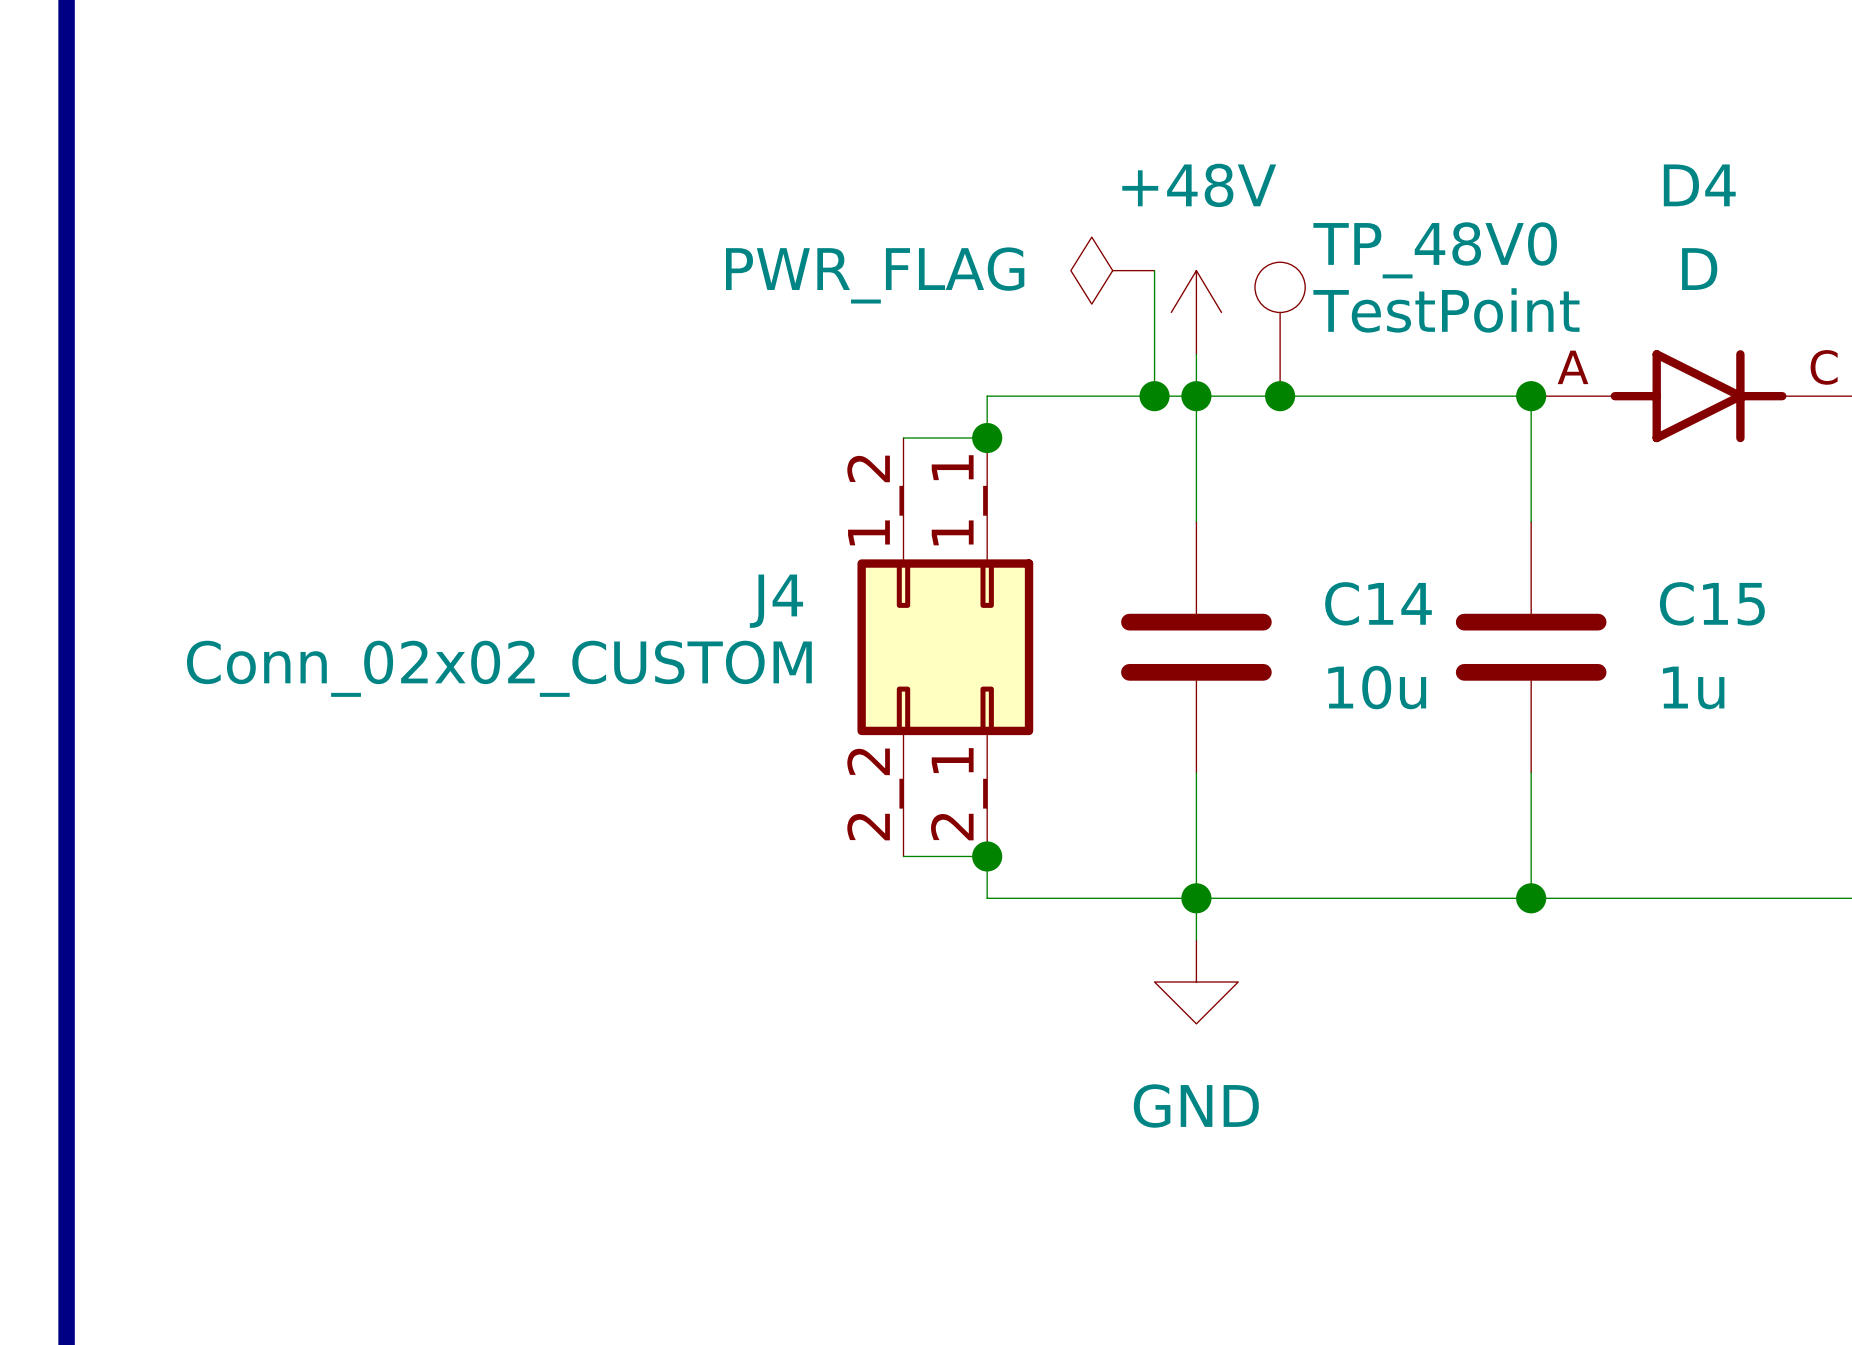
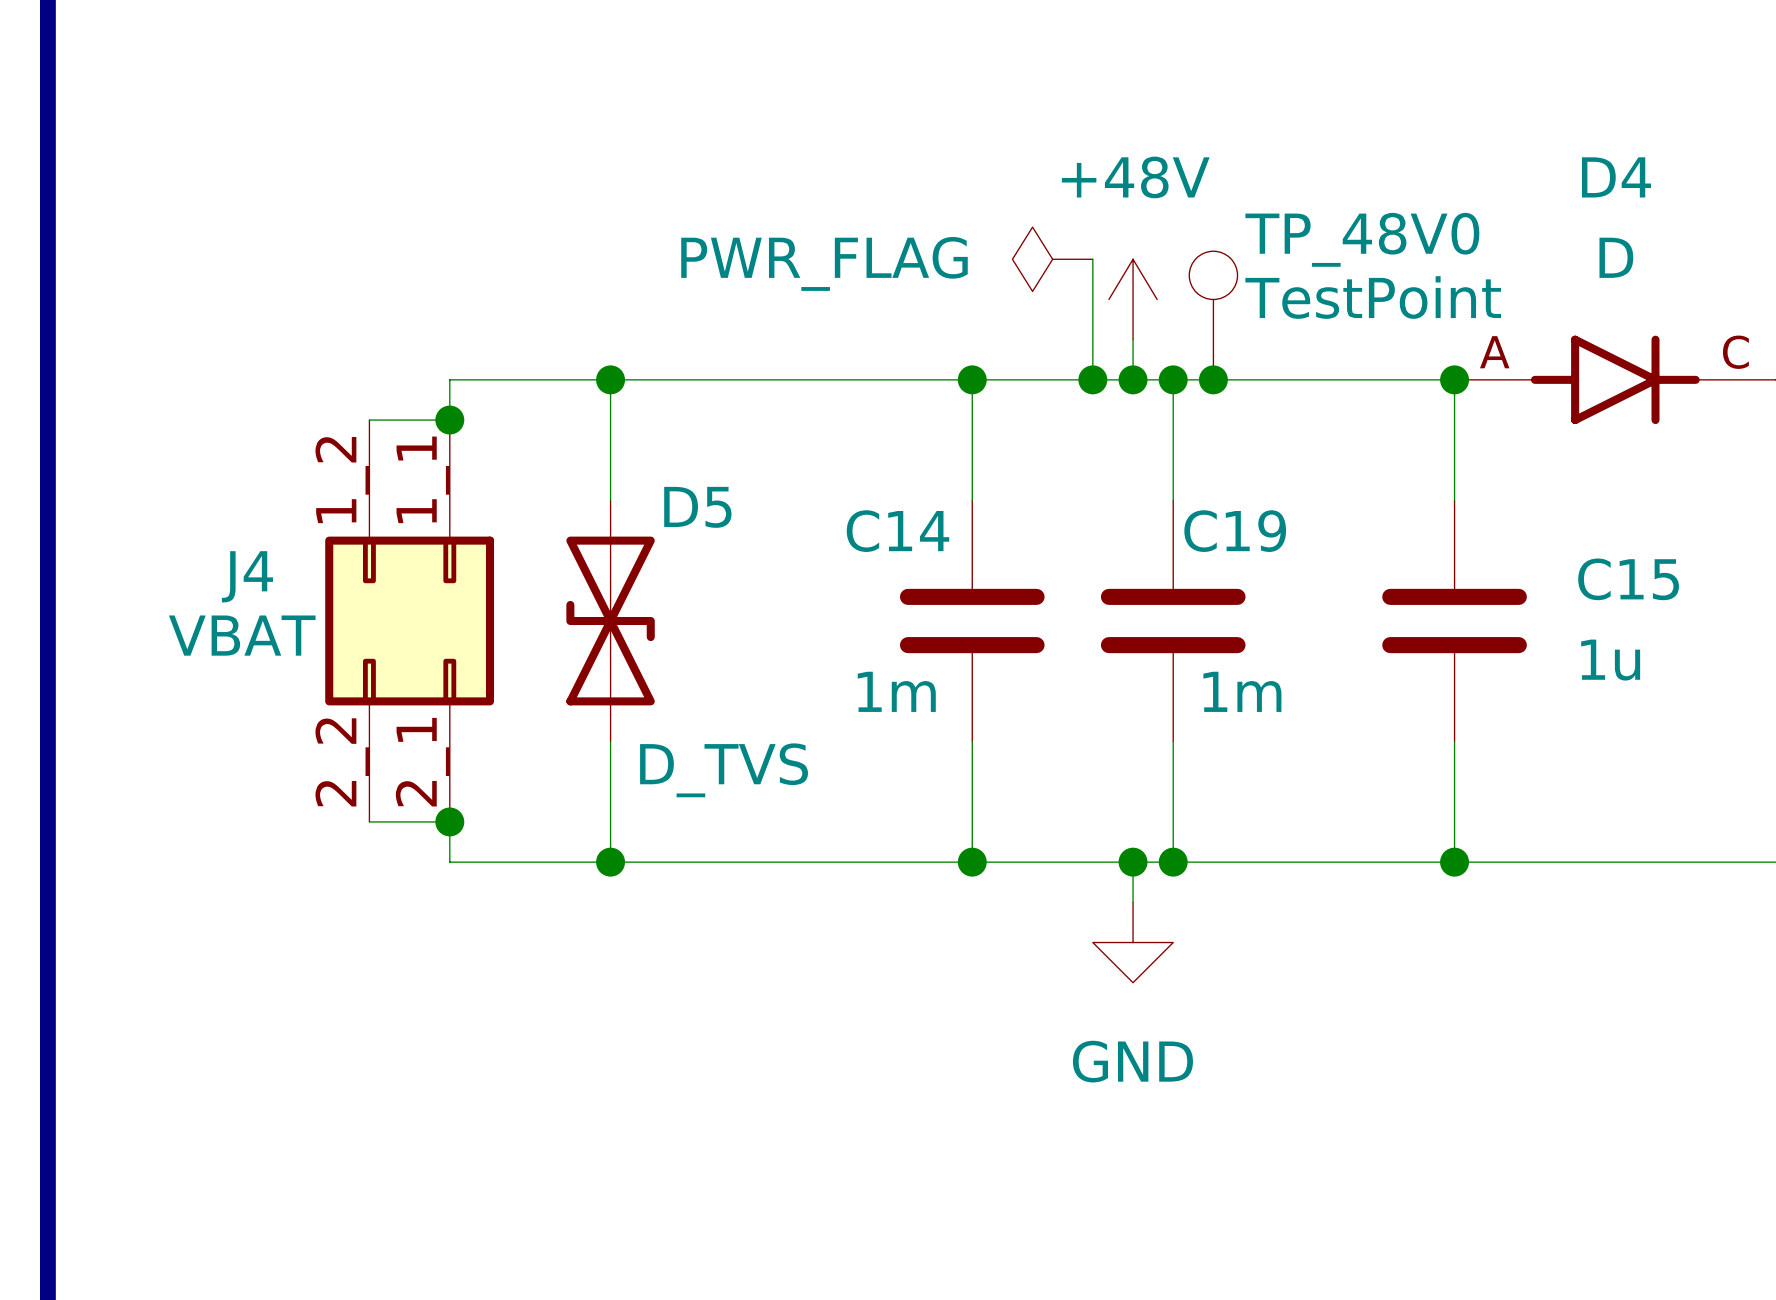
wire: none -> (610, 379) (610, 500)
junction: none -> (610, 379)
wire: (987, 396) (987, 438) (903, 438) -> (932, 379) (449, 379) (449, 420) (369, 420)
wire: none -> (972, 379) (972, 500)
wire: (1196, 396) (1196, 521) -> (1173, 379) (1173, 500)
junction: none -> (1173, 379)
junction: none -> (449, 420)
junction position: (987, 438) -> (972, 379)
C14 name position: C14 (1378, 603) -> C14 (897, 531)
D5: none -> D_TVS (610, 621)
J4 position: (945, 647) -> (409, 621)
C14 position: (1196, 647) -> (972, 621)
C19: none -> 1m (1173, 621)
J4 value: Conn_02x02_CUSTOM (499, 668) -> VBAT (242, 635)
C14 value: 10u (1377, 687) -> 1m (896, 691)
wire: none -> (610, 741) (610, 862)
wire: none -> (972, 741) (972, 862)
wire: (1196, 772) (1196, 898) -> (1173, 741) (1173, 862)
junction: none -> (449, 821)
wire: (903, 856) (987, 856) (987, 898) -> (369, 821) (449, 821) (449, 862) (932, 862)
junction position: (987, 856) -> (972, 862)
junction: none -> (610, 862)
junction: none -> (1173, 862)

